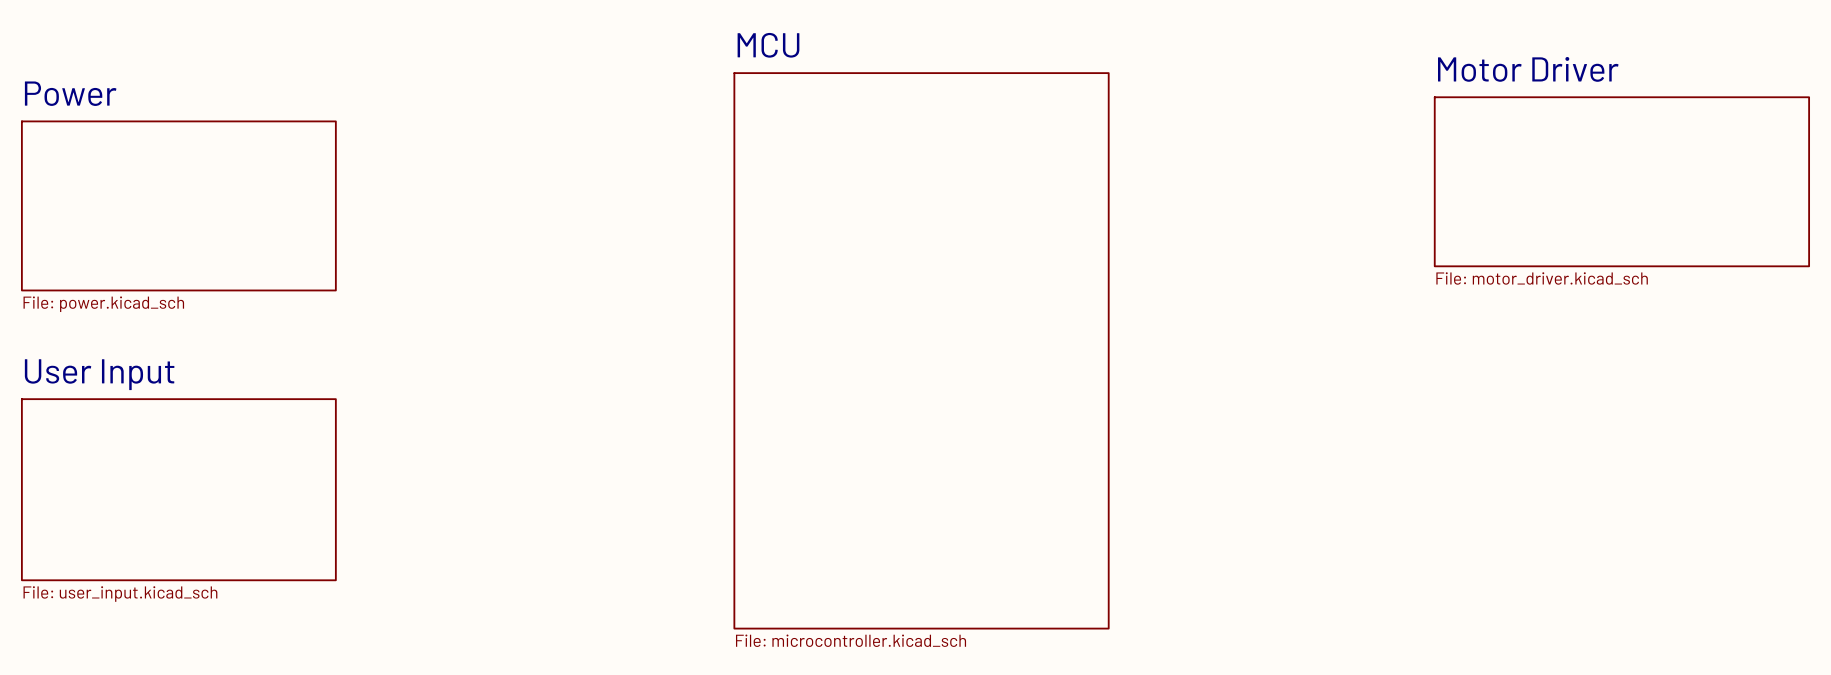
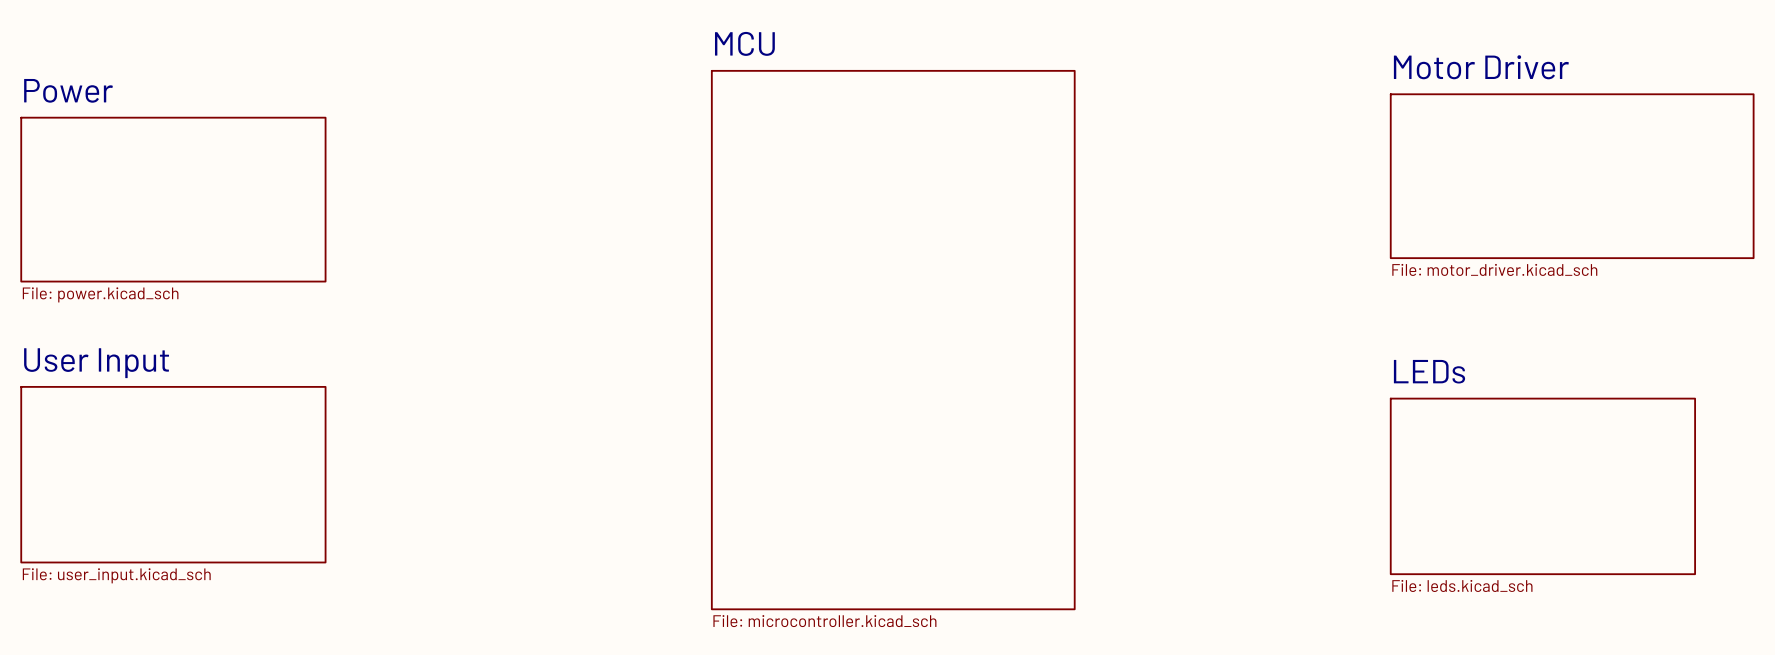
sheet LEDs: none -> File: leds.kicad_sch (1542, 486)

